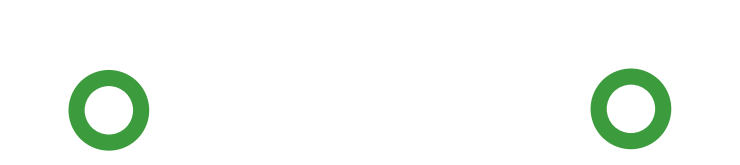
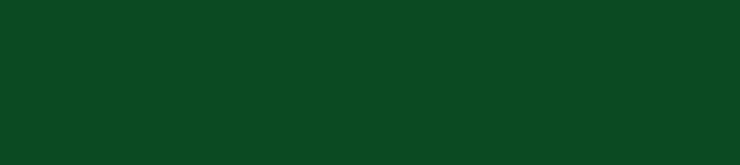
part: (630, 108) -> none
part: (108, 110) -> none

